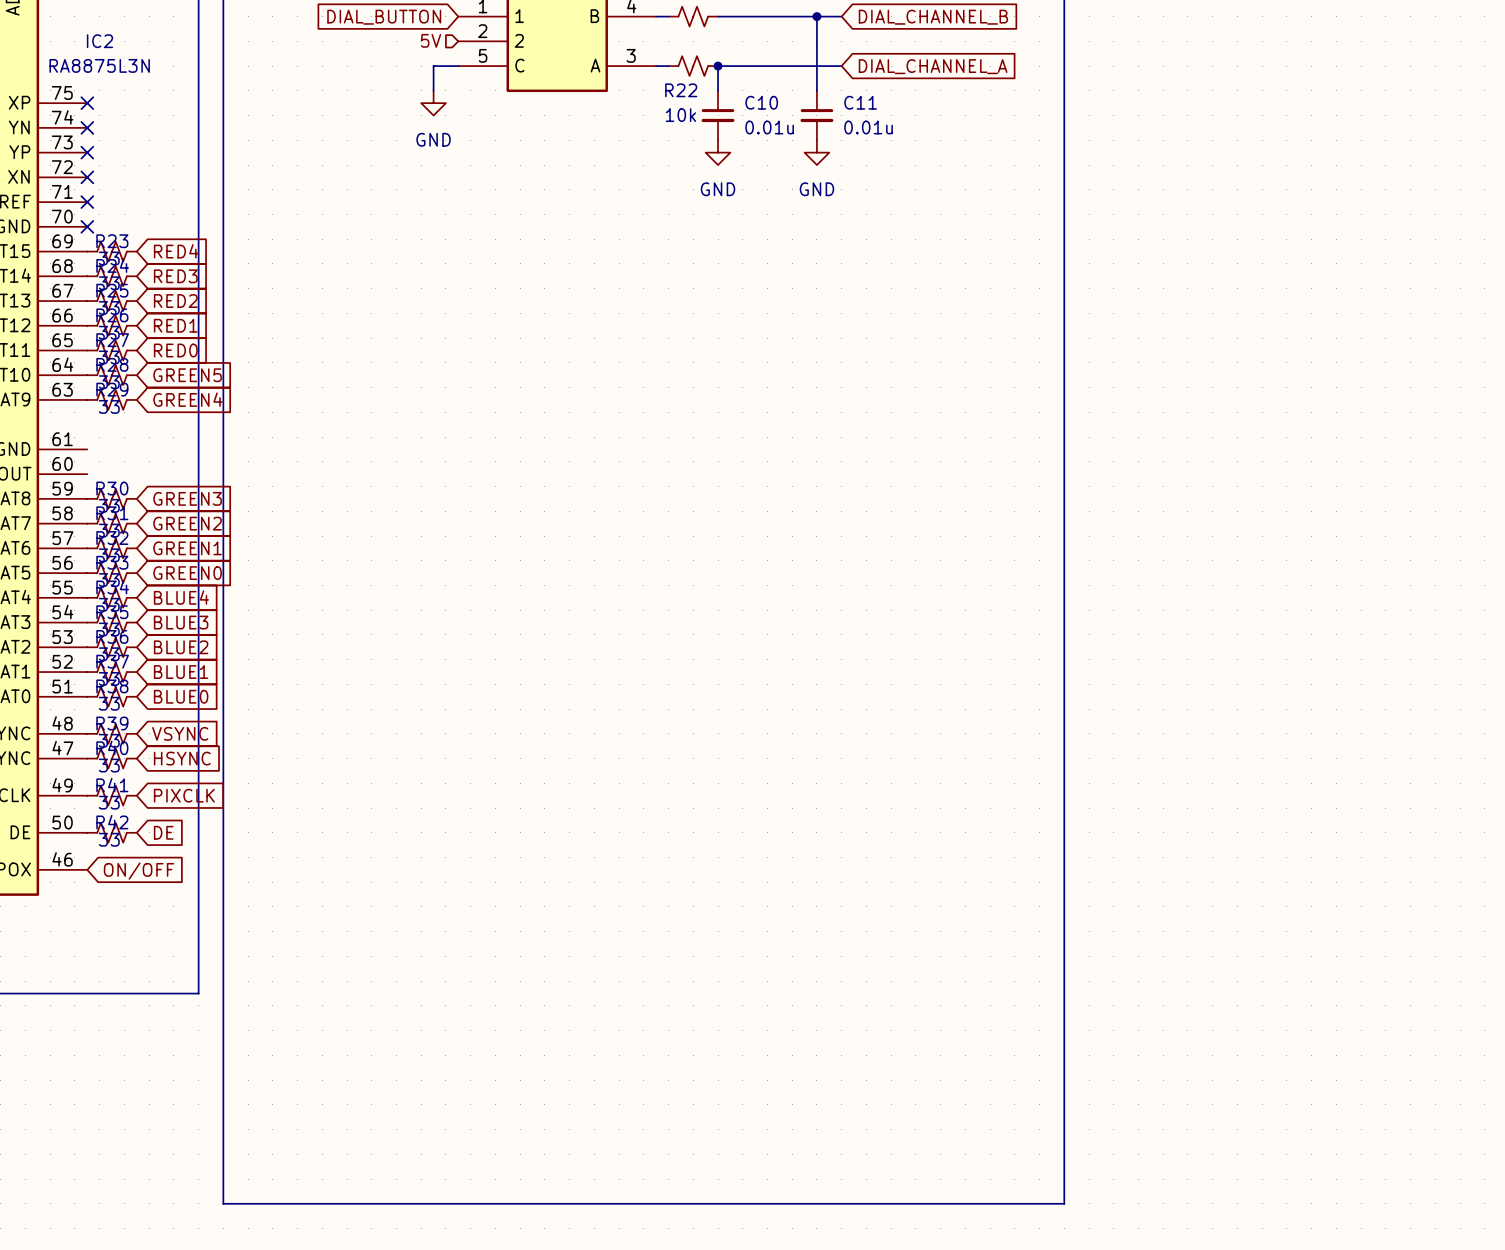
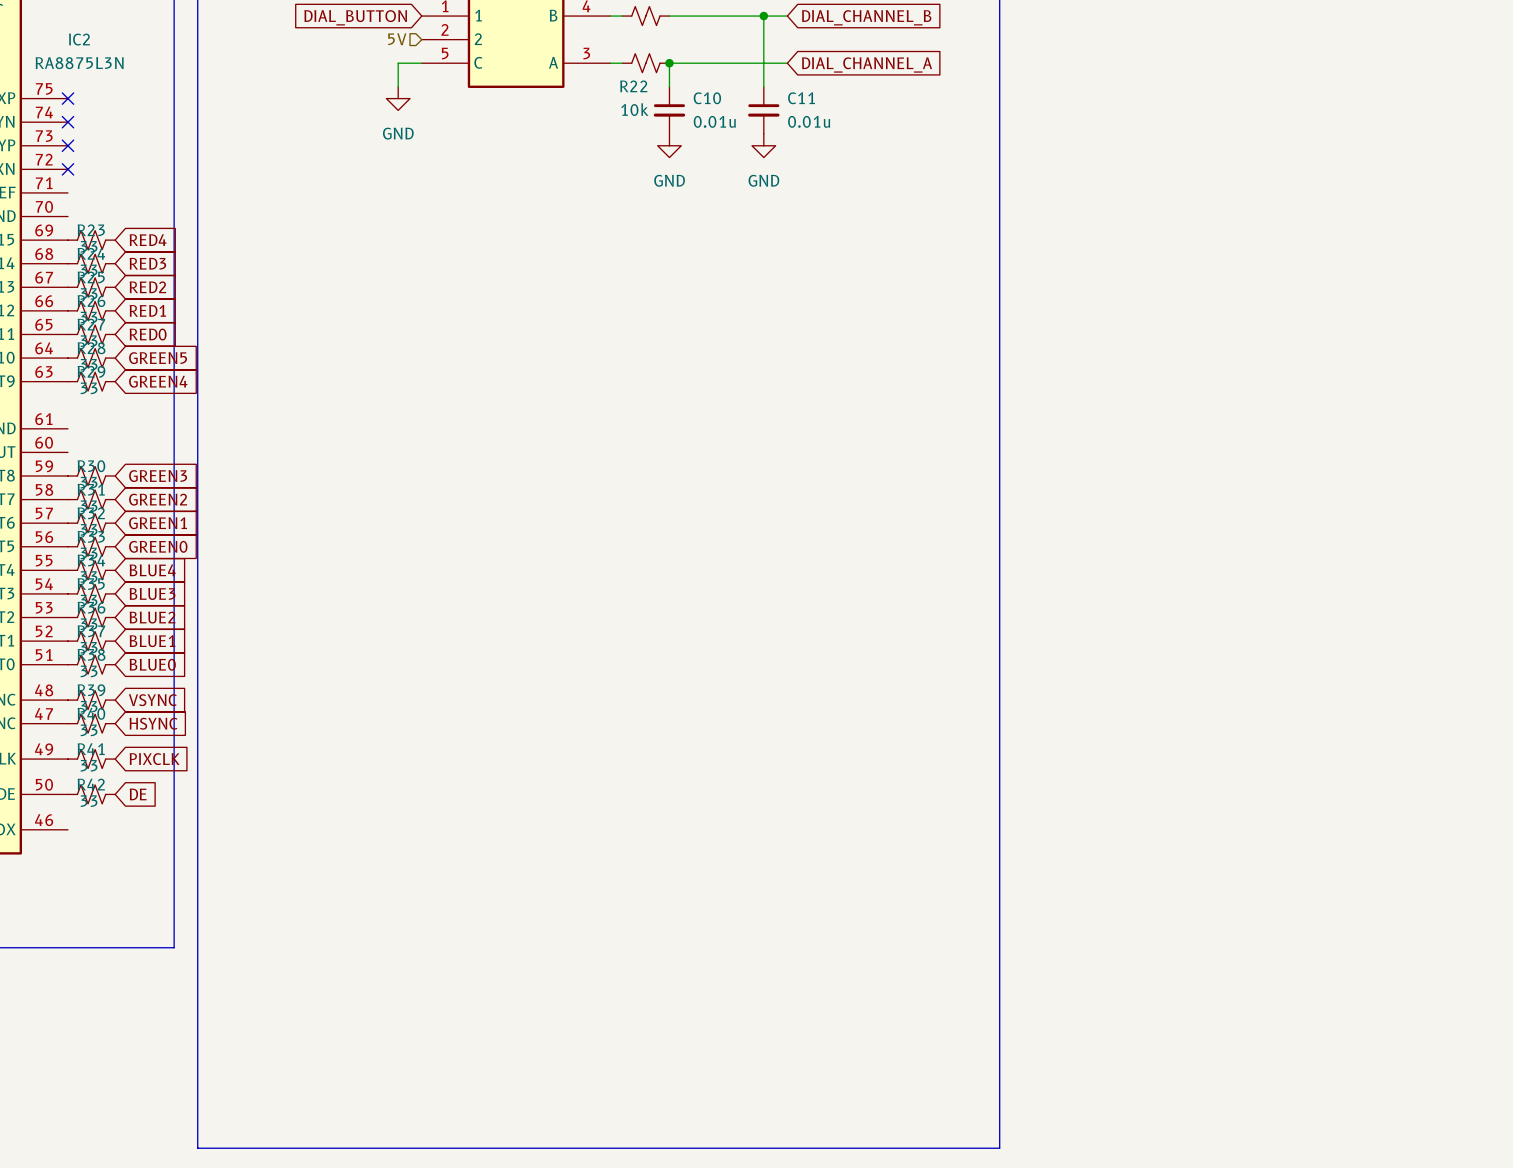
no-connect mark: (87, 202) -> none
no-connect mark: (87, 226) -> none
global label: ON/OFF (139, 871) -> none

